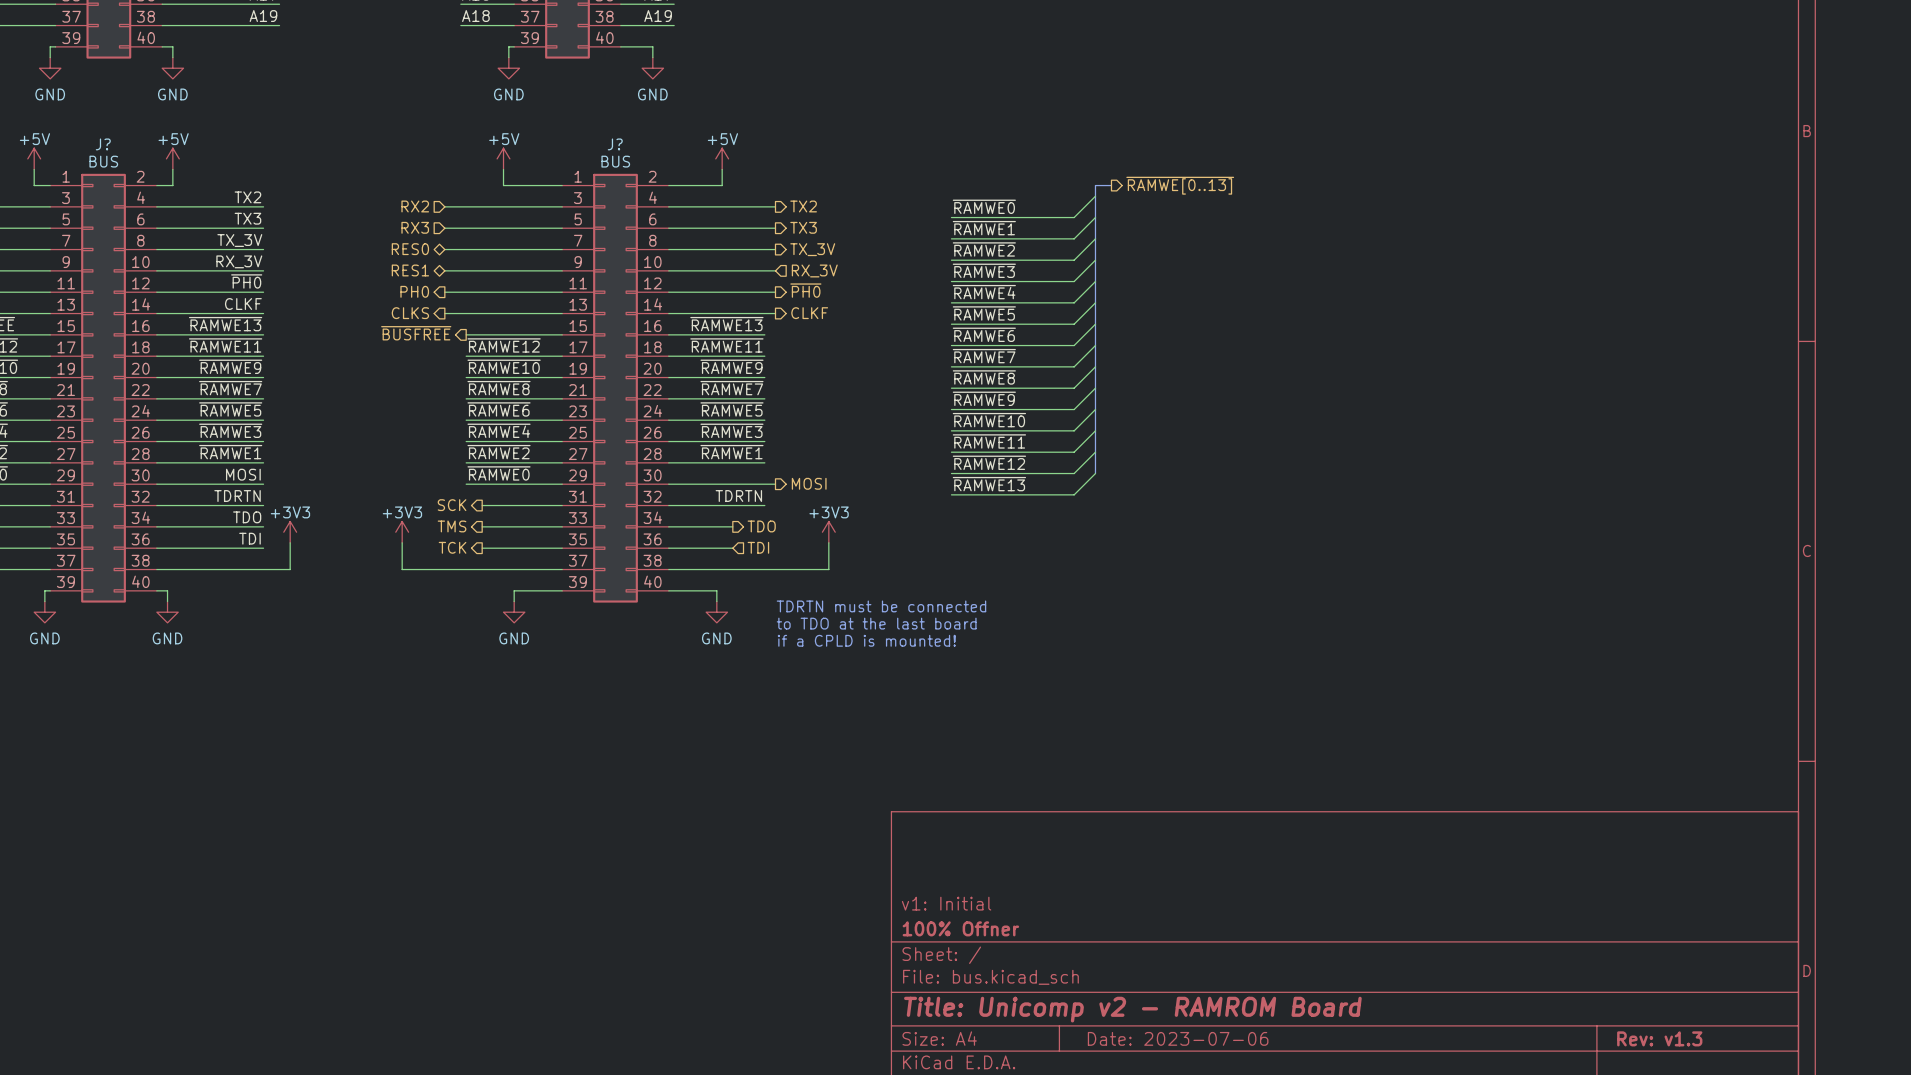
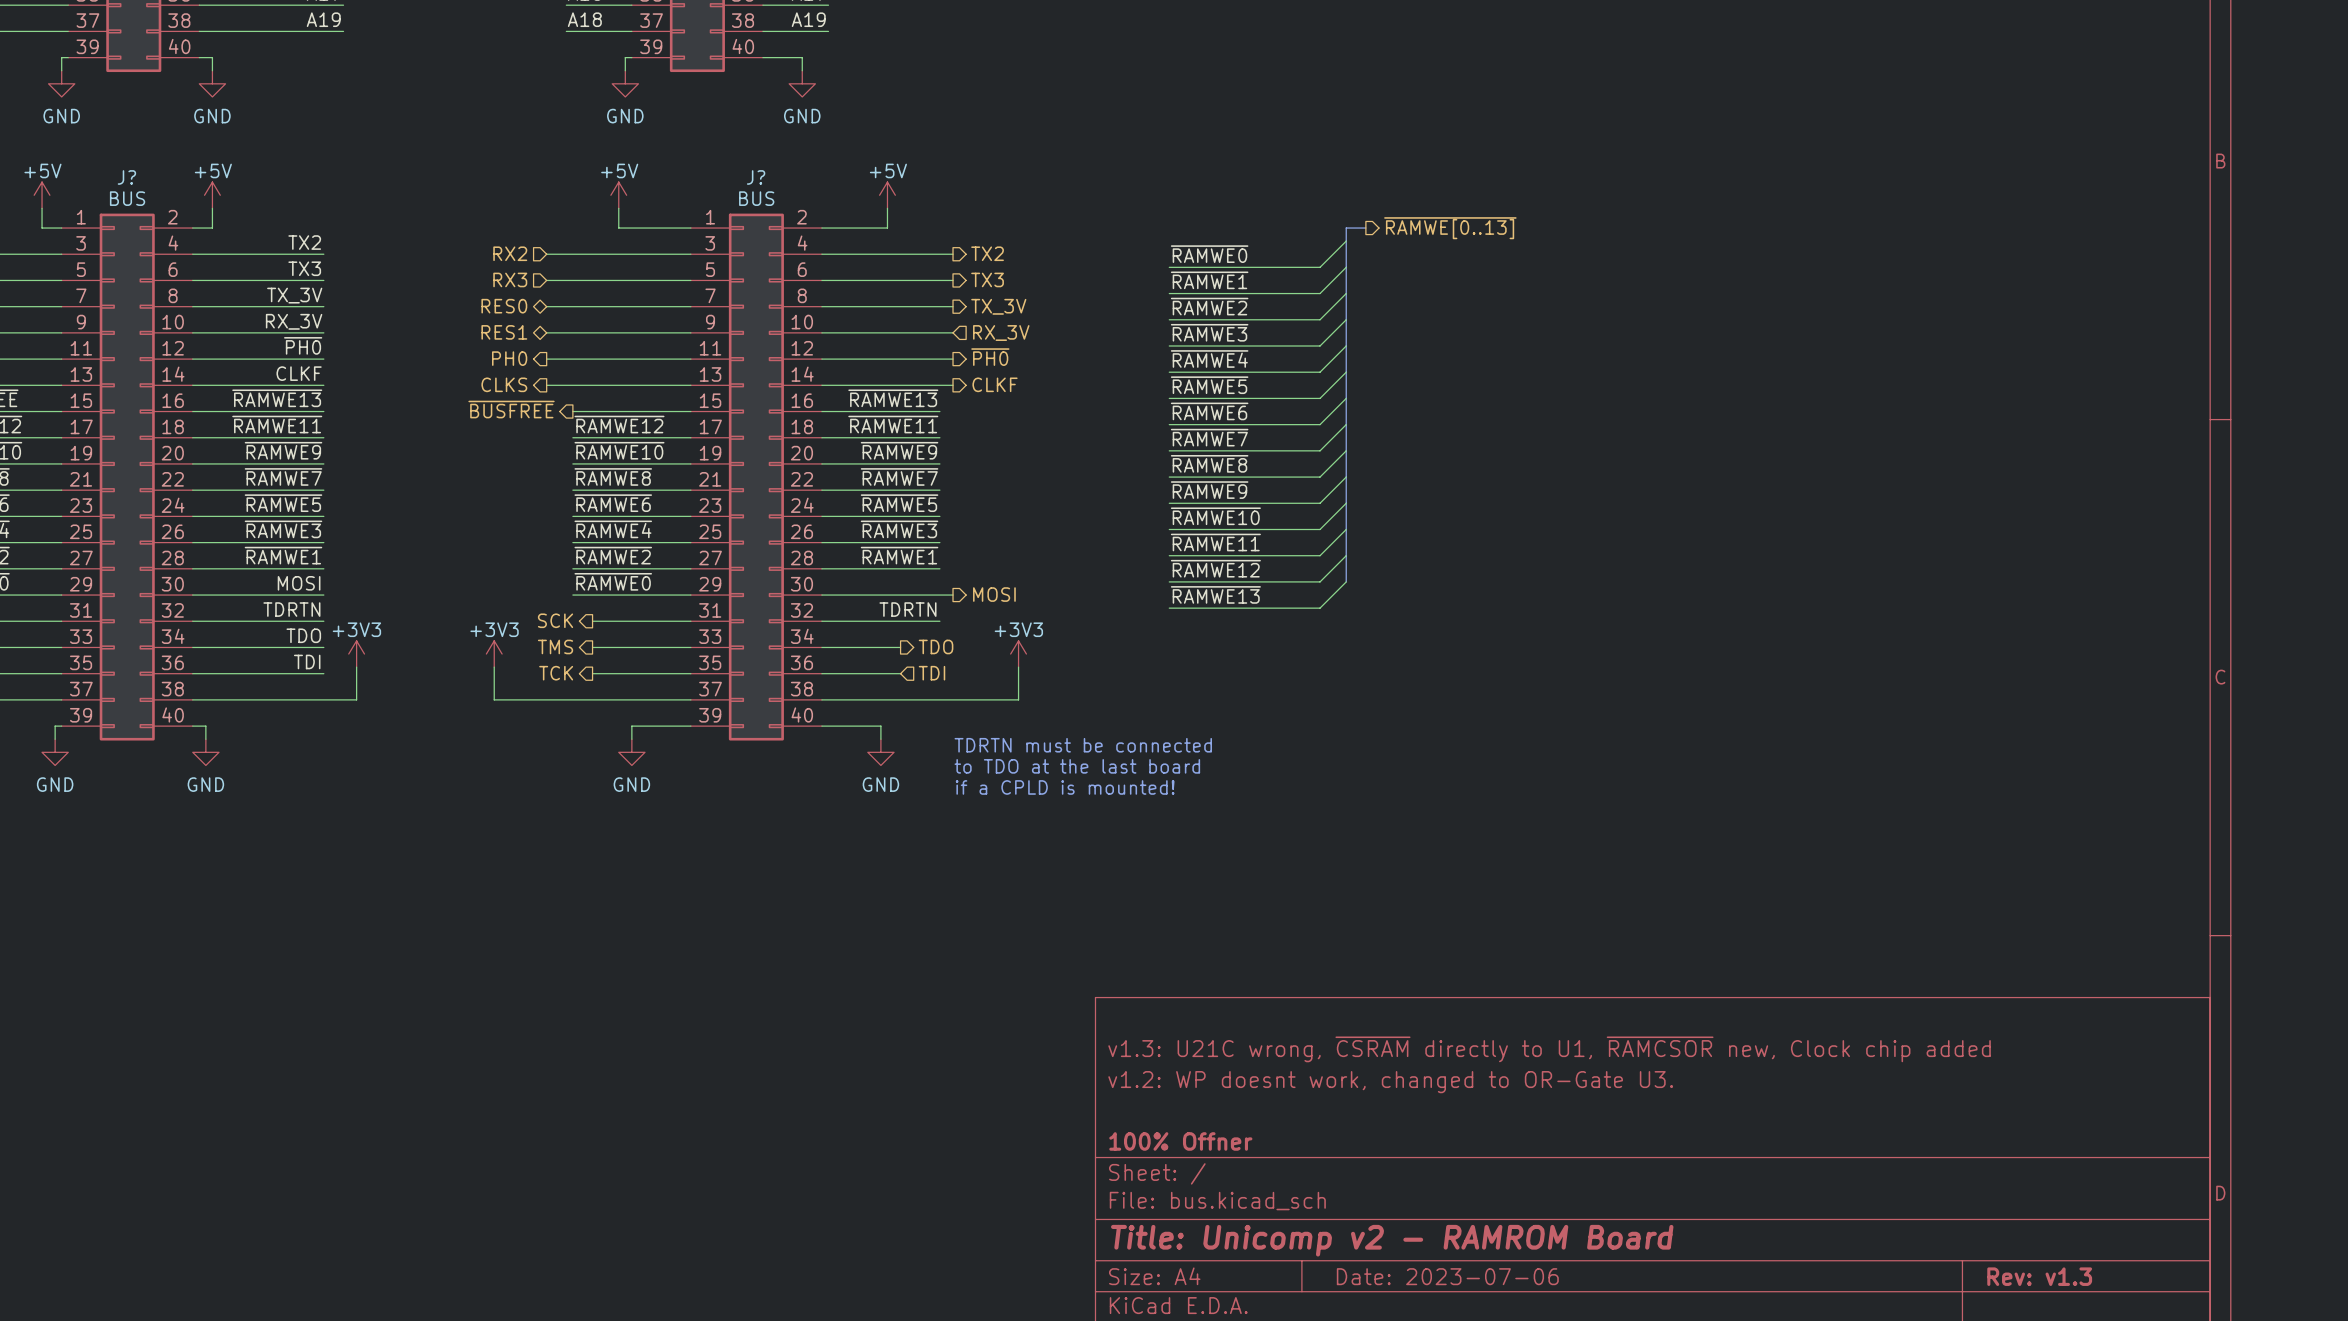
title block: none -> v1.3: U21C wrong, ~{CSRAM} directly to U1, ~{RAMCSOR} new, Clock chip added (1549, 1049)
title block: none -> v1.2: WP doesnt work, changed to OR-Gate U3. (1390, 1082)
title block: v1: Initial (946, 903) -> none

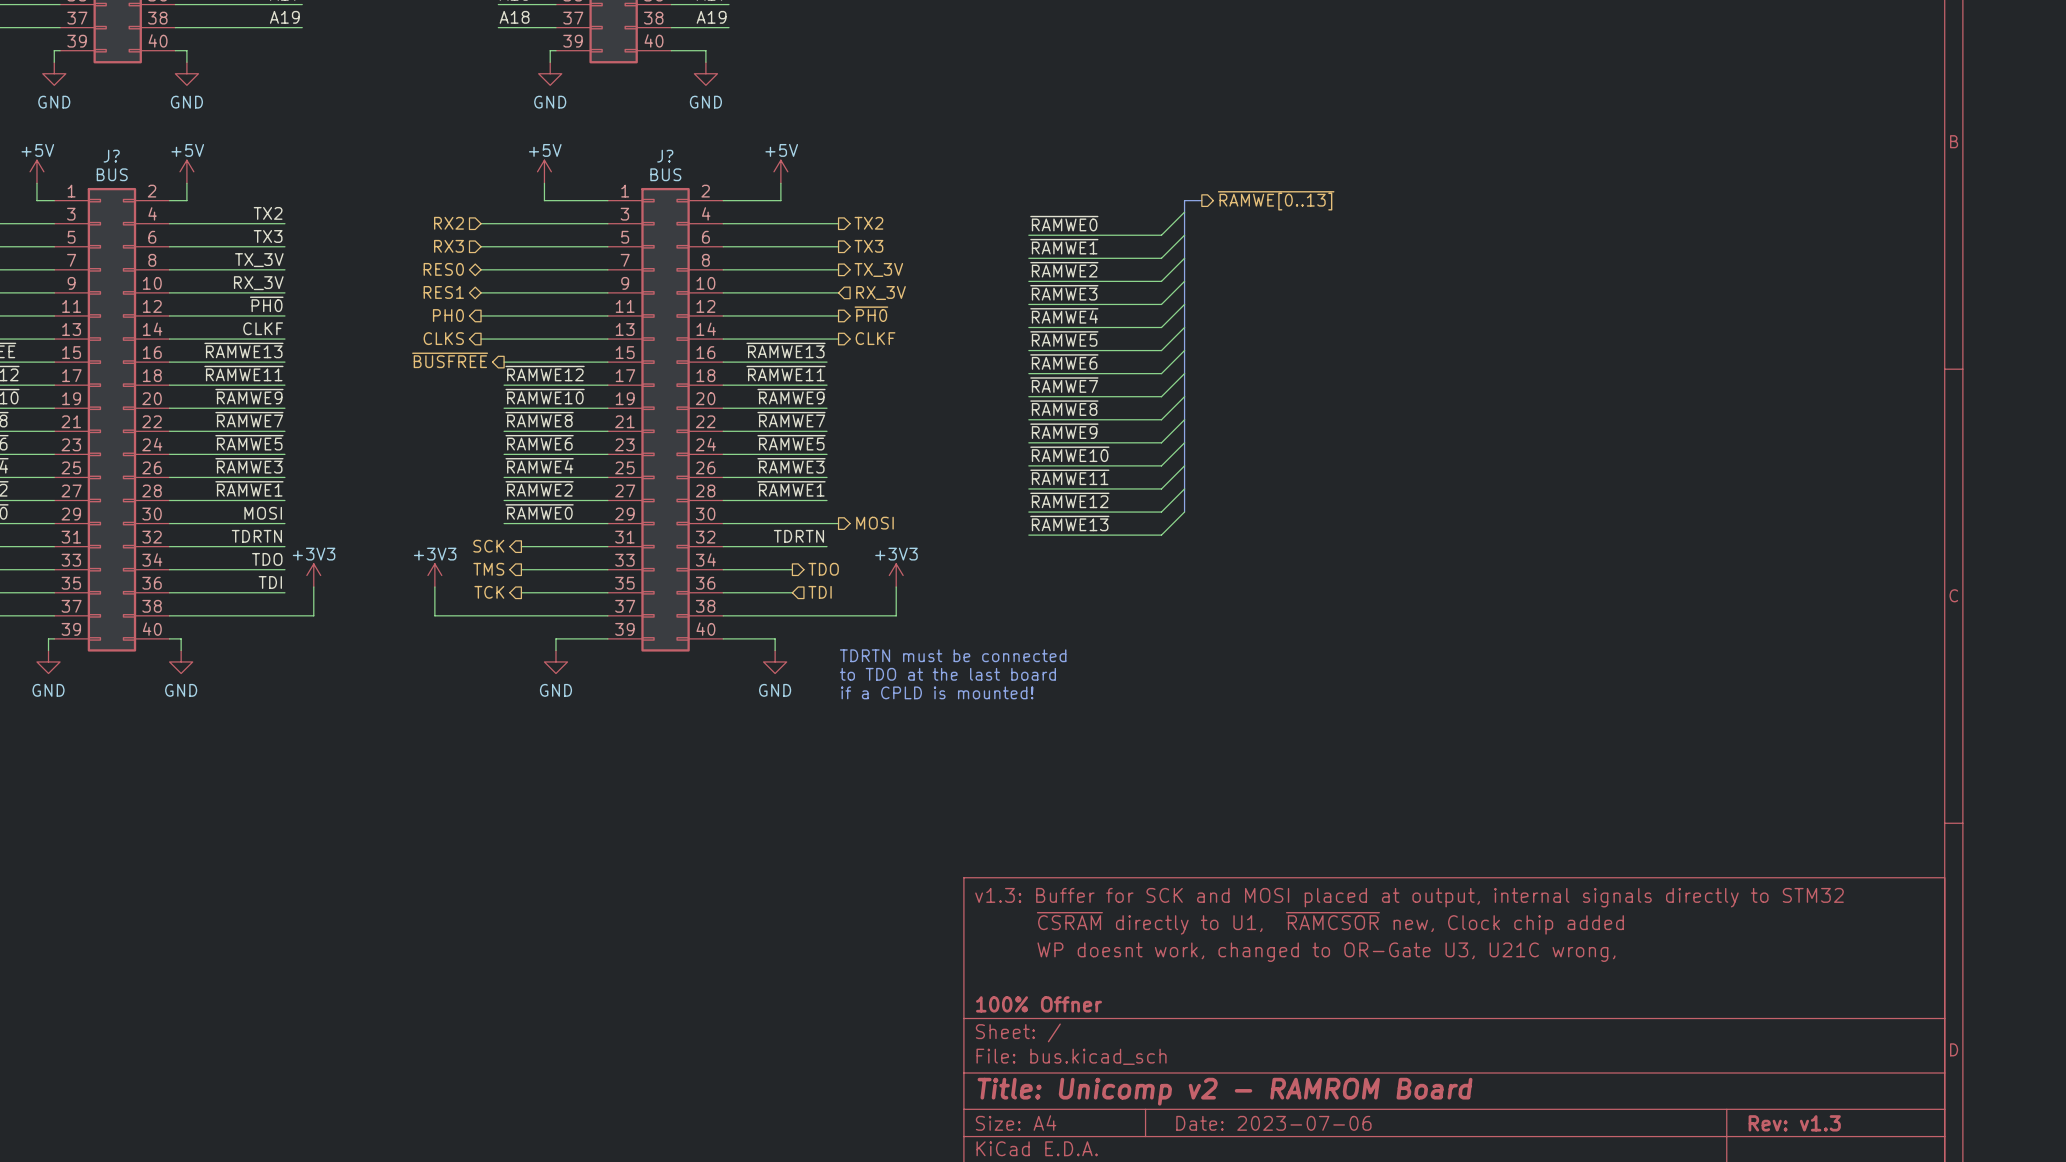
title block: none -> v1.3: Buffer for SCK and MOSI placed at output, internal signals directly to STM32 (1409, 897)
title block: v1.3: U21C wrong, ~{CSRAM} directly to U1, ~{RAMCSOR} new, Clock chip added (1549, 1049) -> ~{CSRAM} directly to U1, ~{RAMCSOR} new, Clock chip added (1330, 923)
title block: v1.2: WP doesnt work, changed to OR-Gate U3. (1390, 1082) -> WP doesnt work, changed to OR-Gate U3, U21C wrong, (1326, 952)

